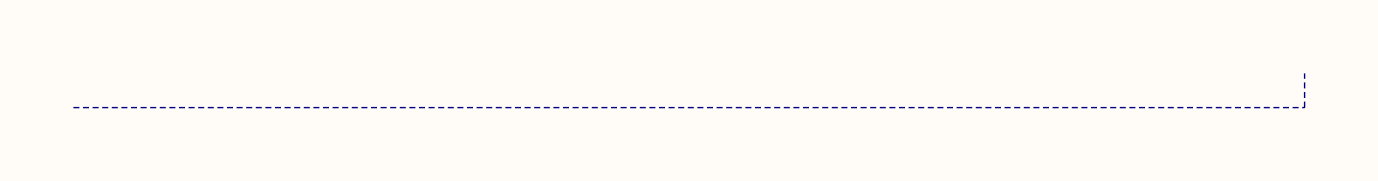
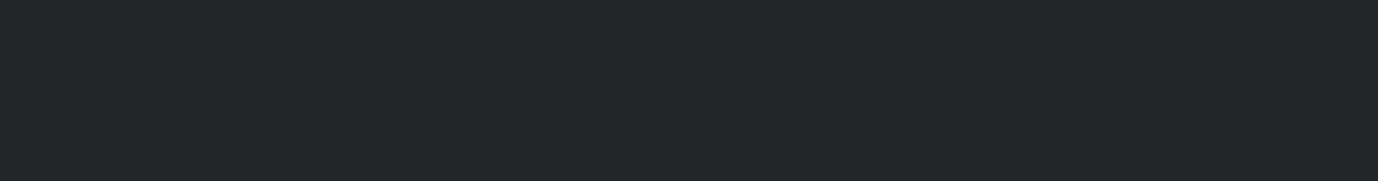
line: (1304, 73) (1304, 107) (73, 107) -> none

